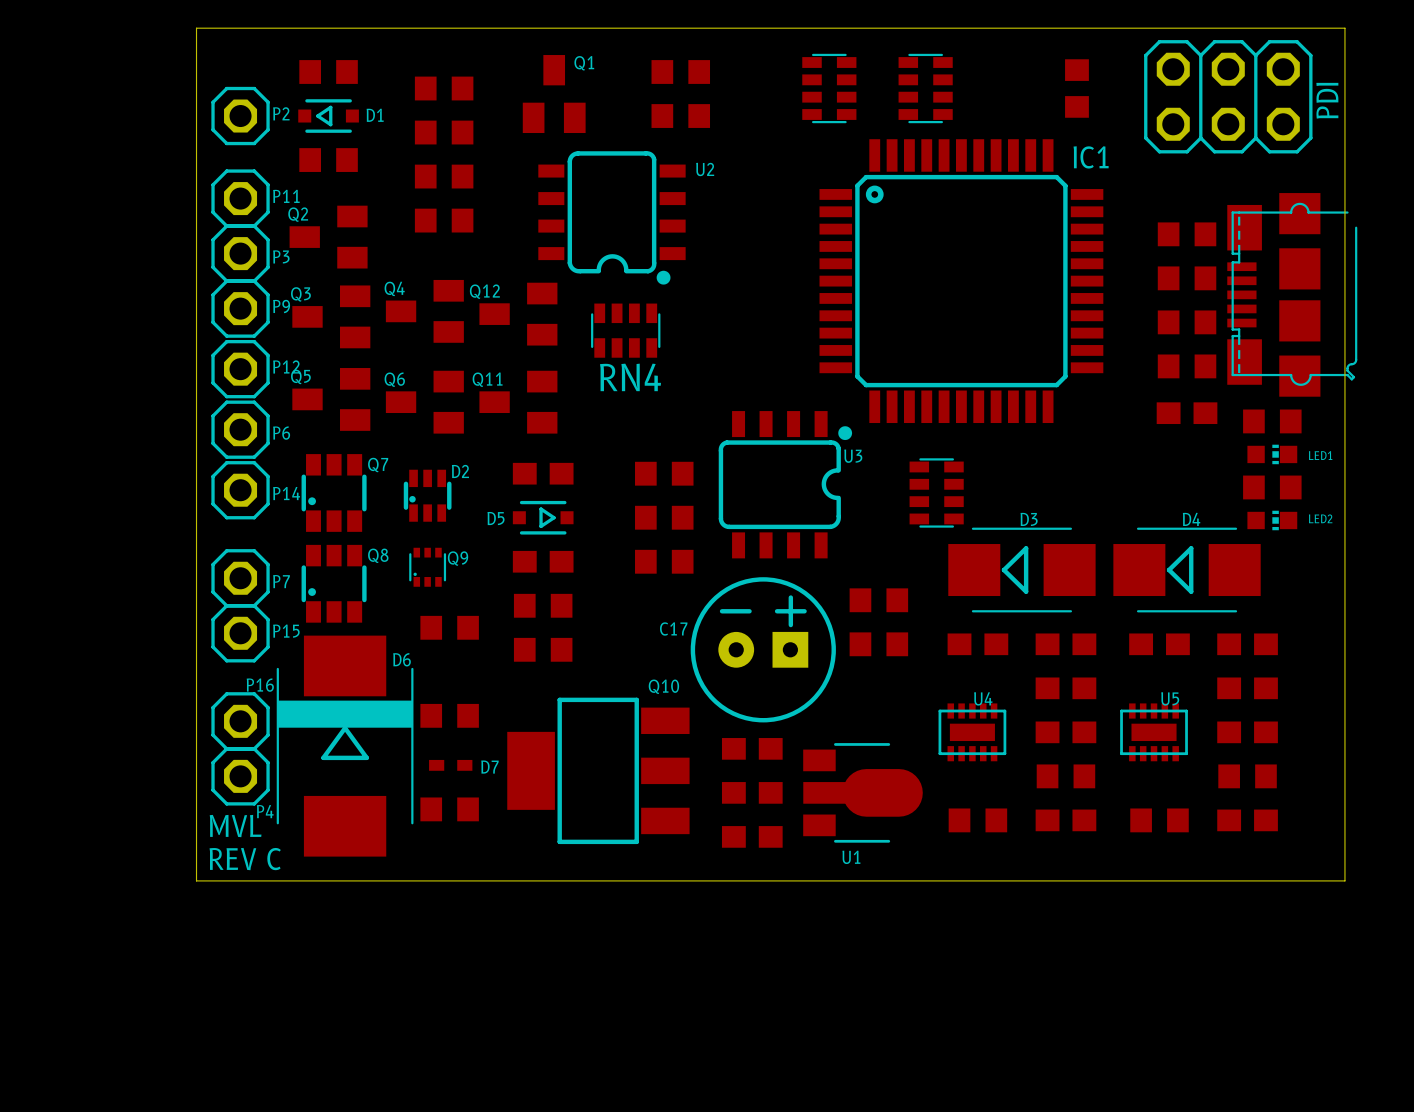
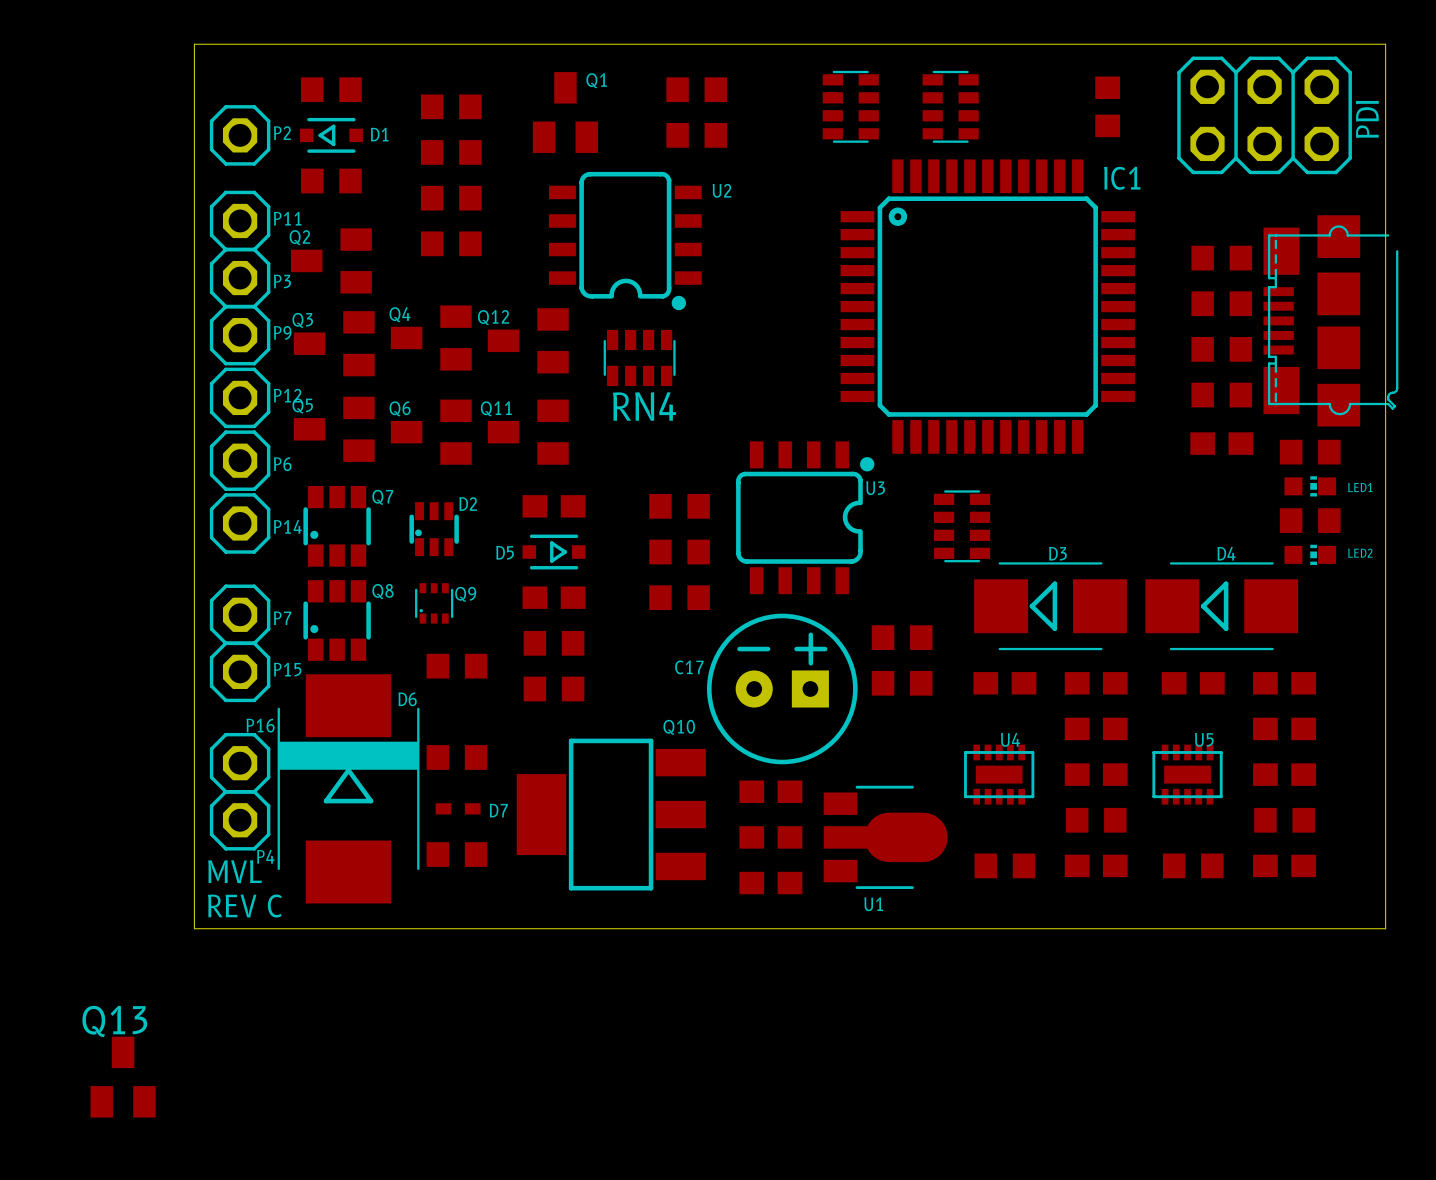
Q13: none -> (123, 1077)

